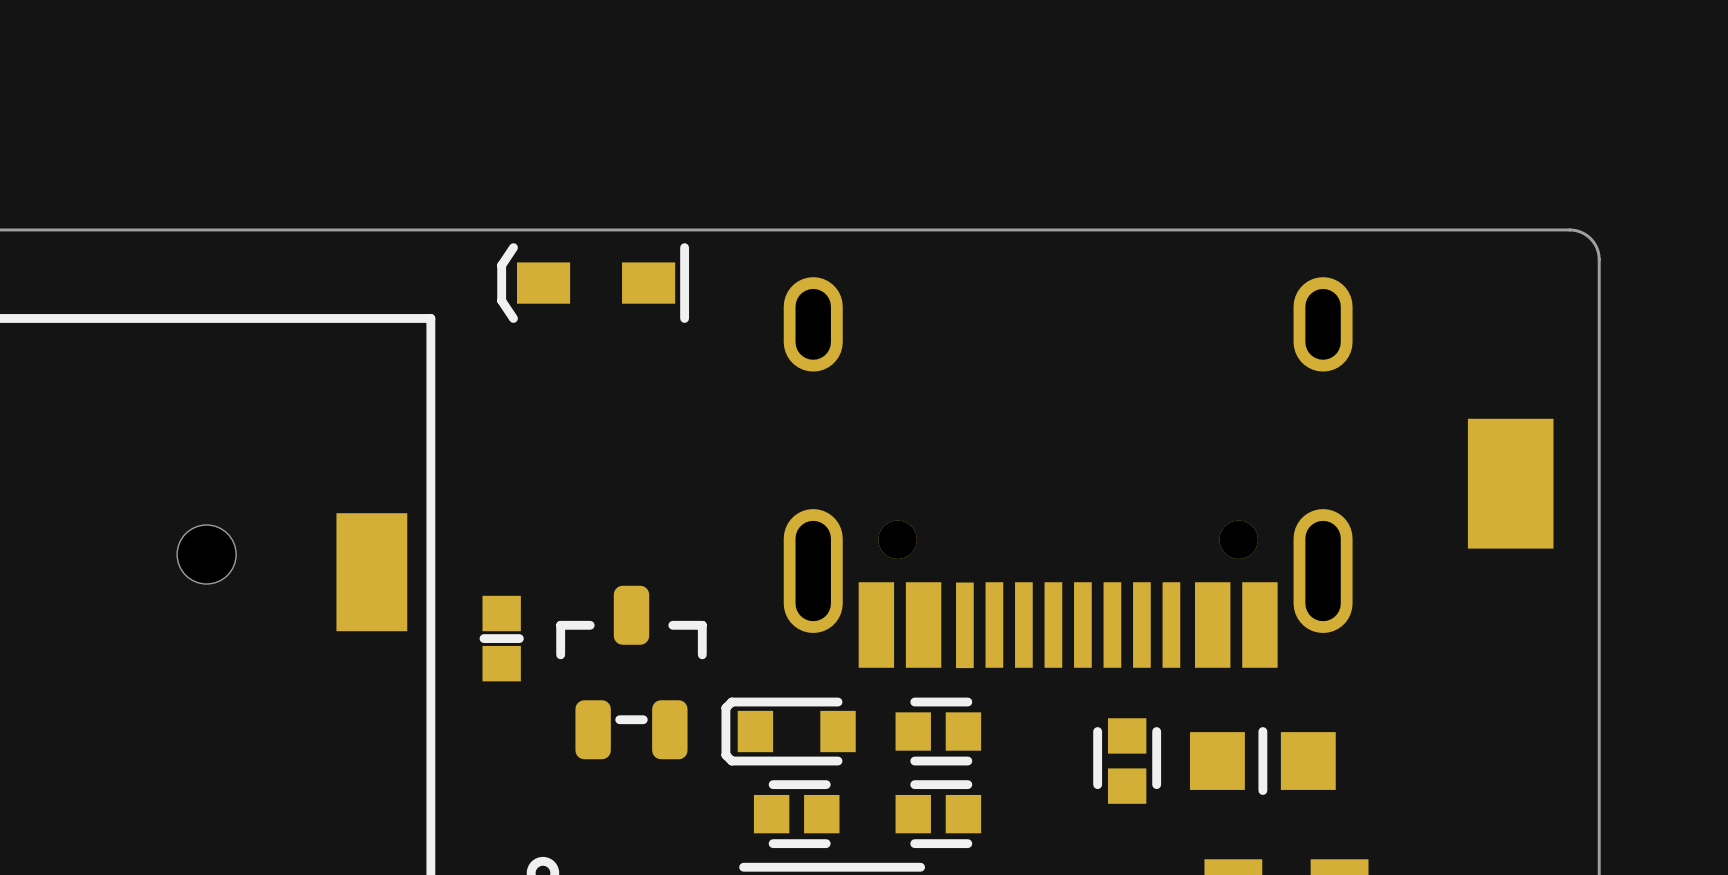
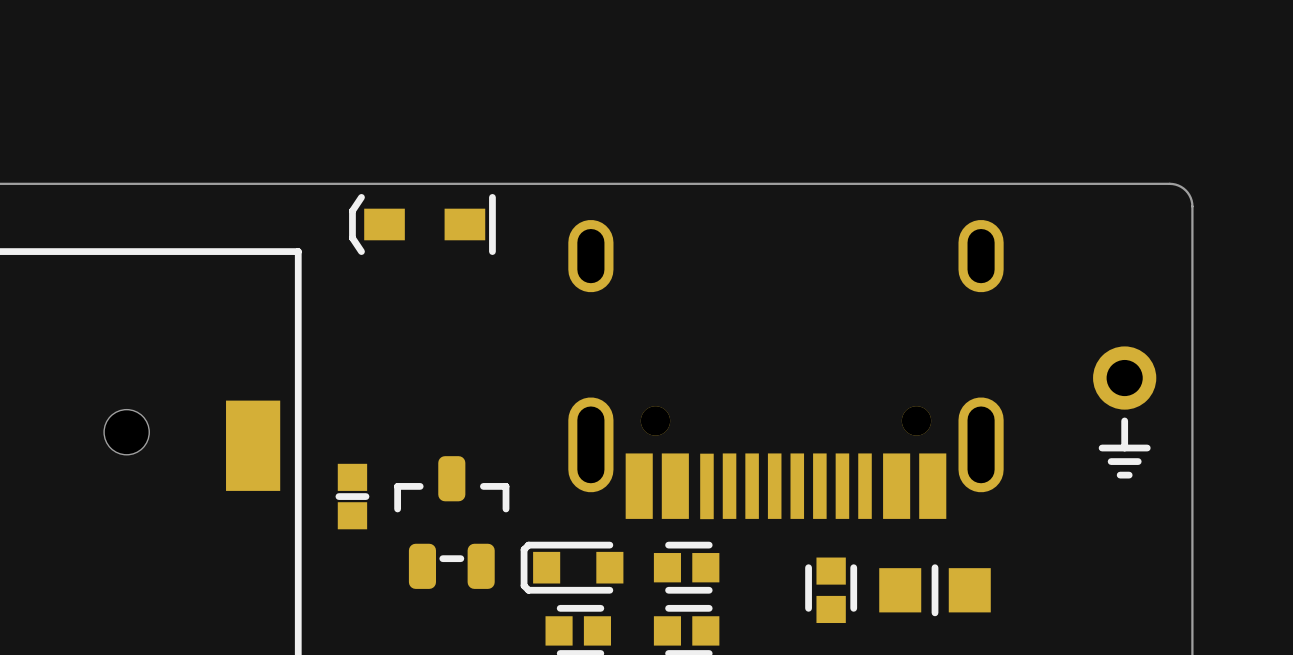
part footprint: [1467, 418, 1554, 549] -> [1093, 346, 1157, 410]
line: none -> (1124, 420) (1124, 448)
line: none -> (1147, 448) (1102, 448)
line: none -> (1138, 461) (1111, 461)
line: none -> (1129, 475) (1120, 475)

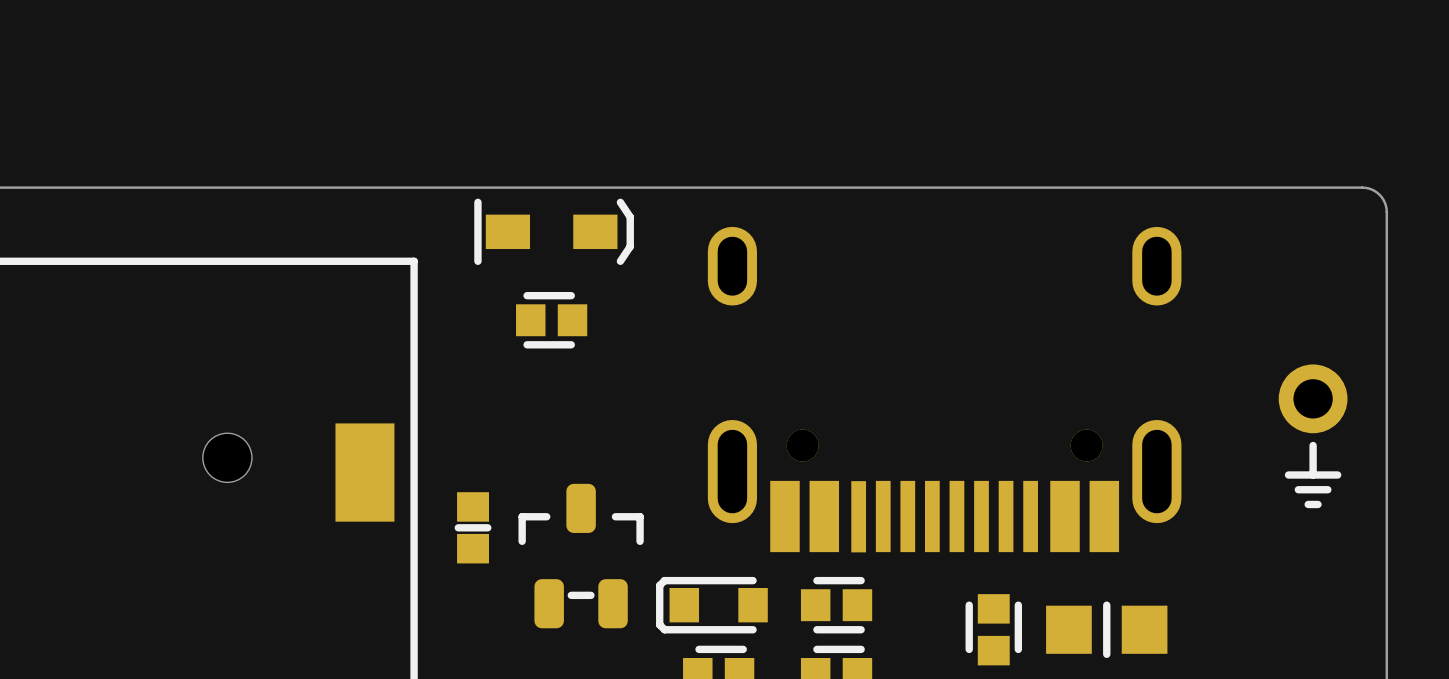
part rotation: 0° (422, 224) -> 180° (554, 231)
part: none -> (551, 320)

